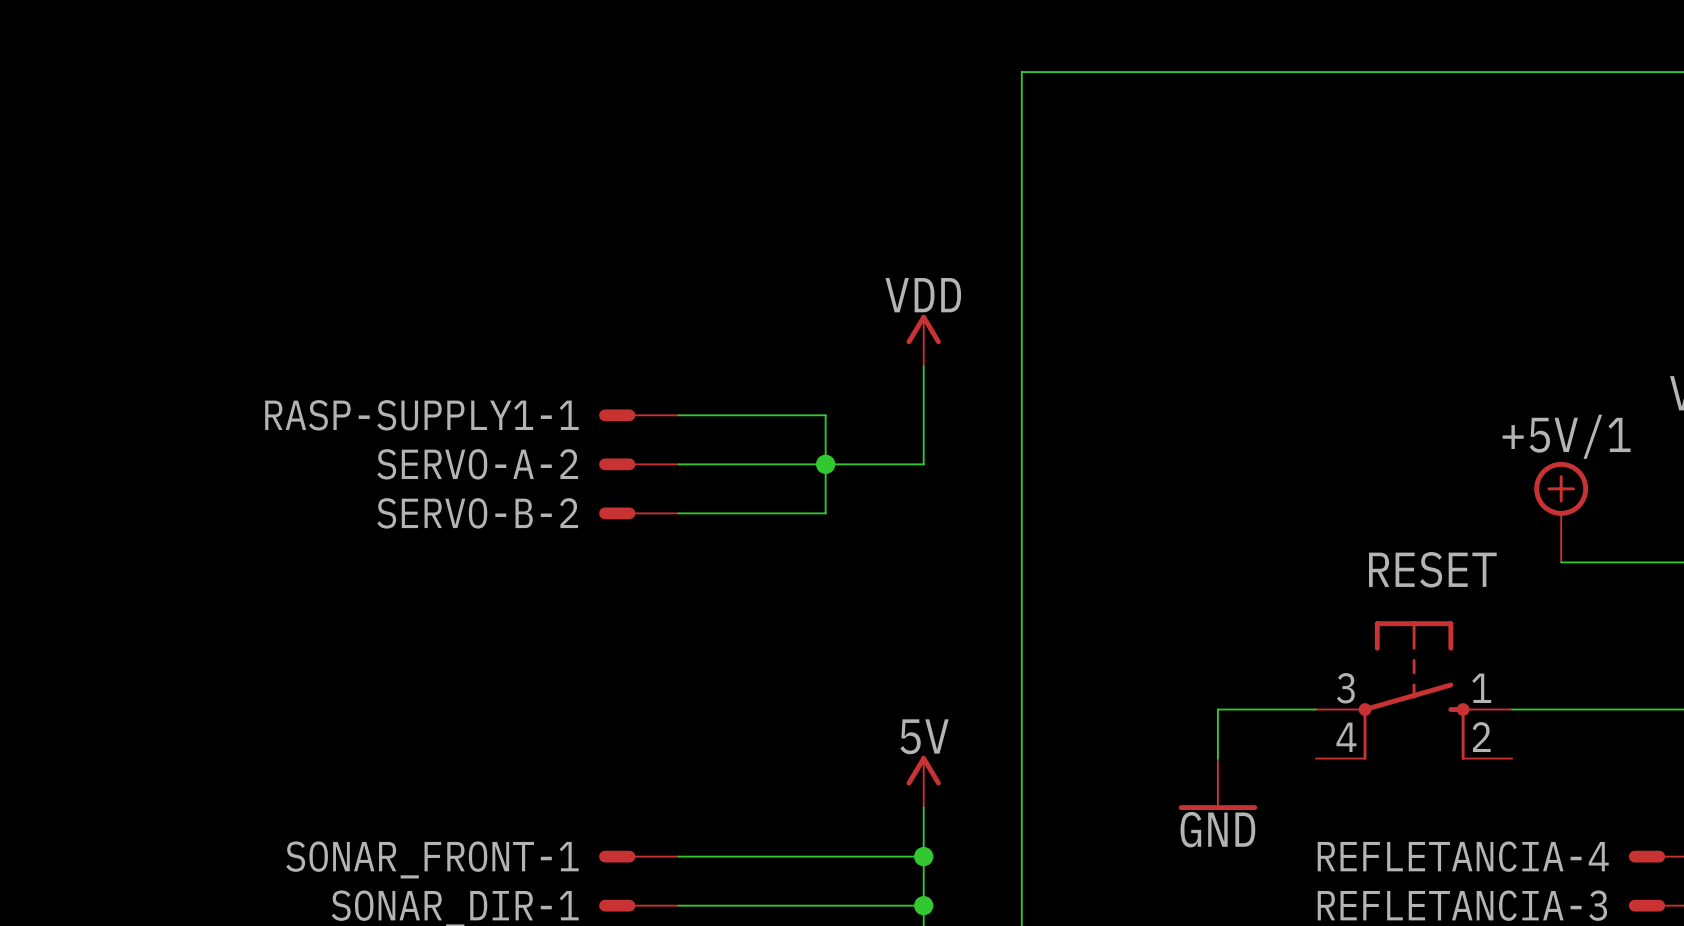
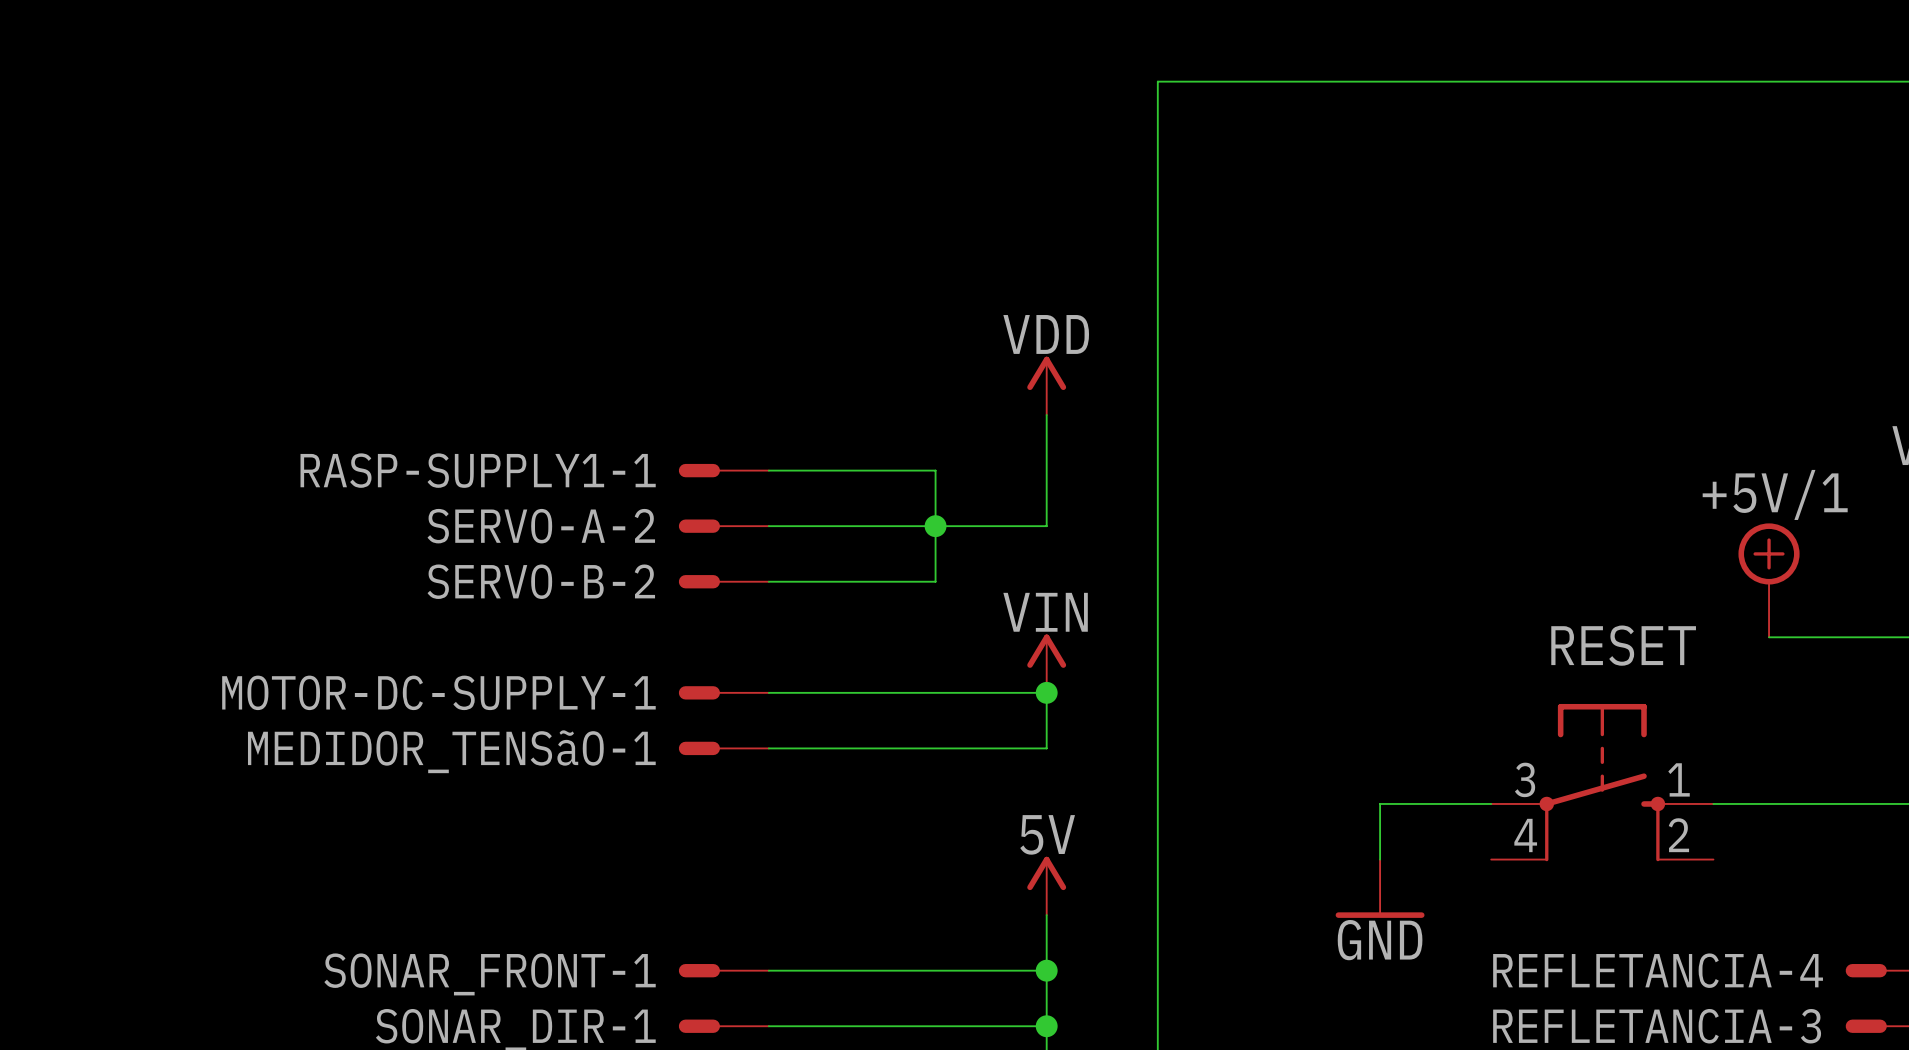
power symbol: none -> VIN (1046, 663)
MOTOR-DC-SUPPLY-1: none -> (723, 692)
wire: none -> (768, 692) (1046, 692) (1046, 748) (768, 748)
junction: none -> (1046, 692)
MEDIDOR_TENSãO-1: none -> (723, 748)

